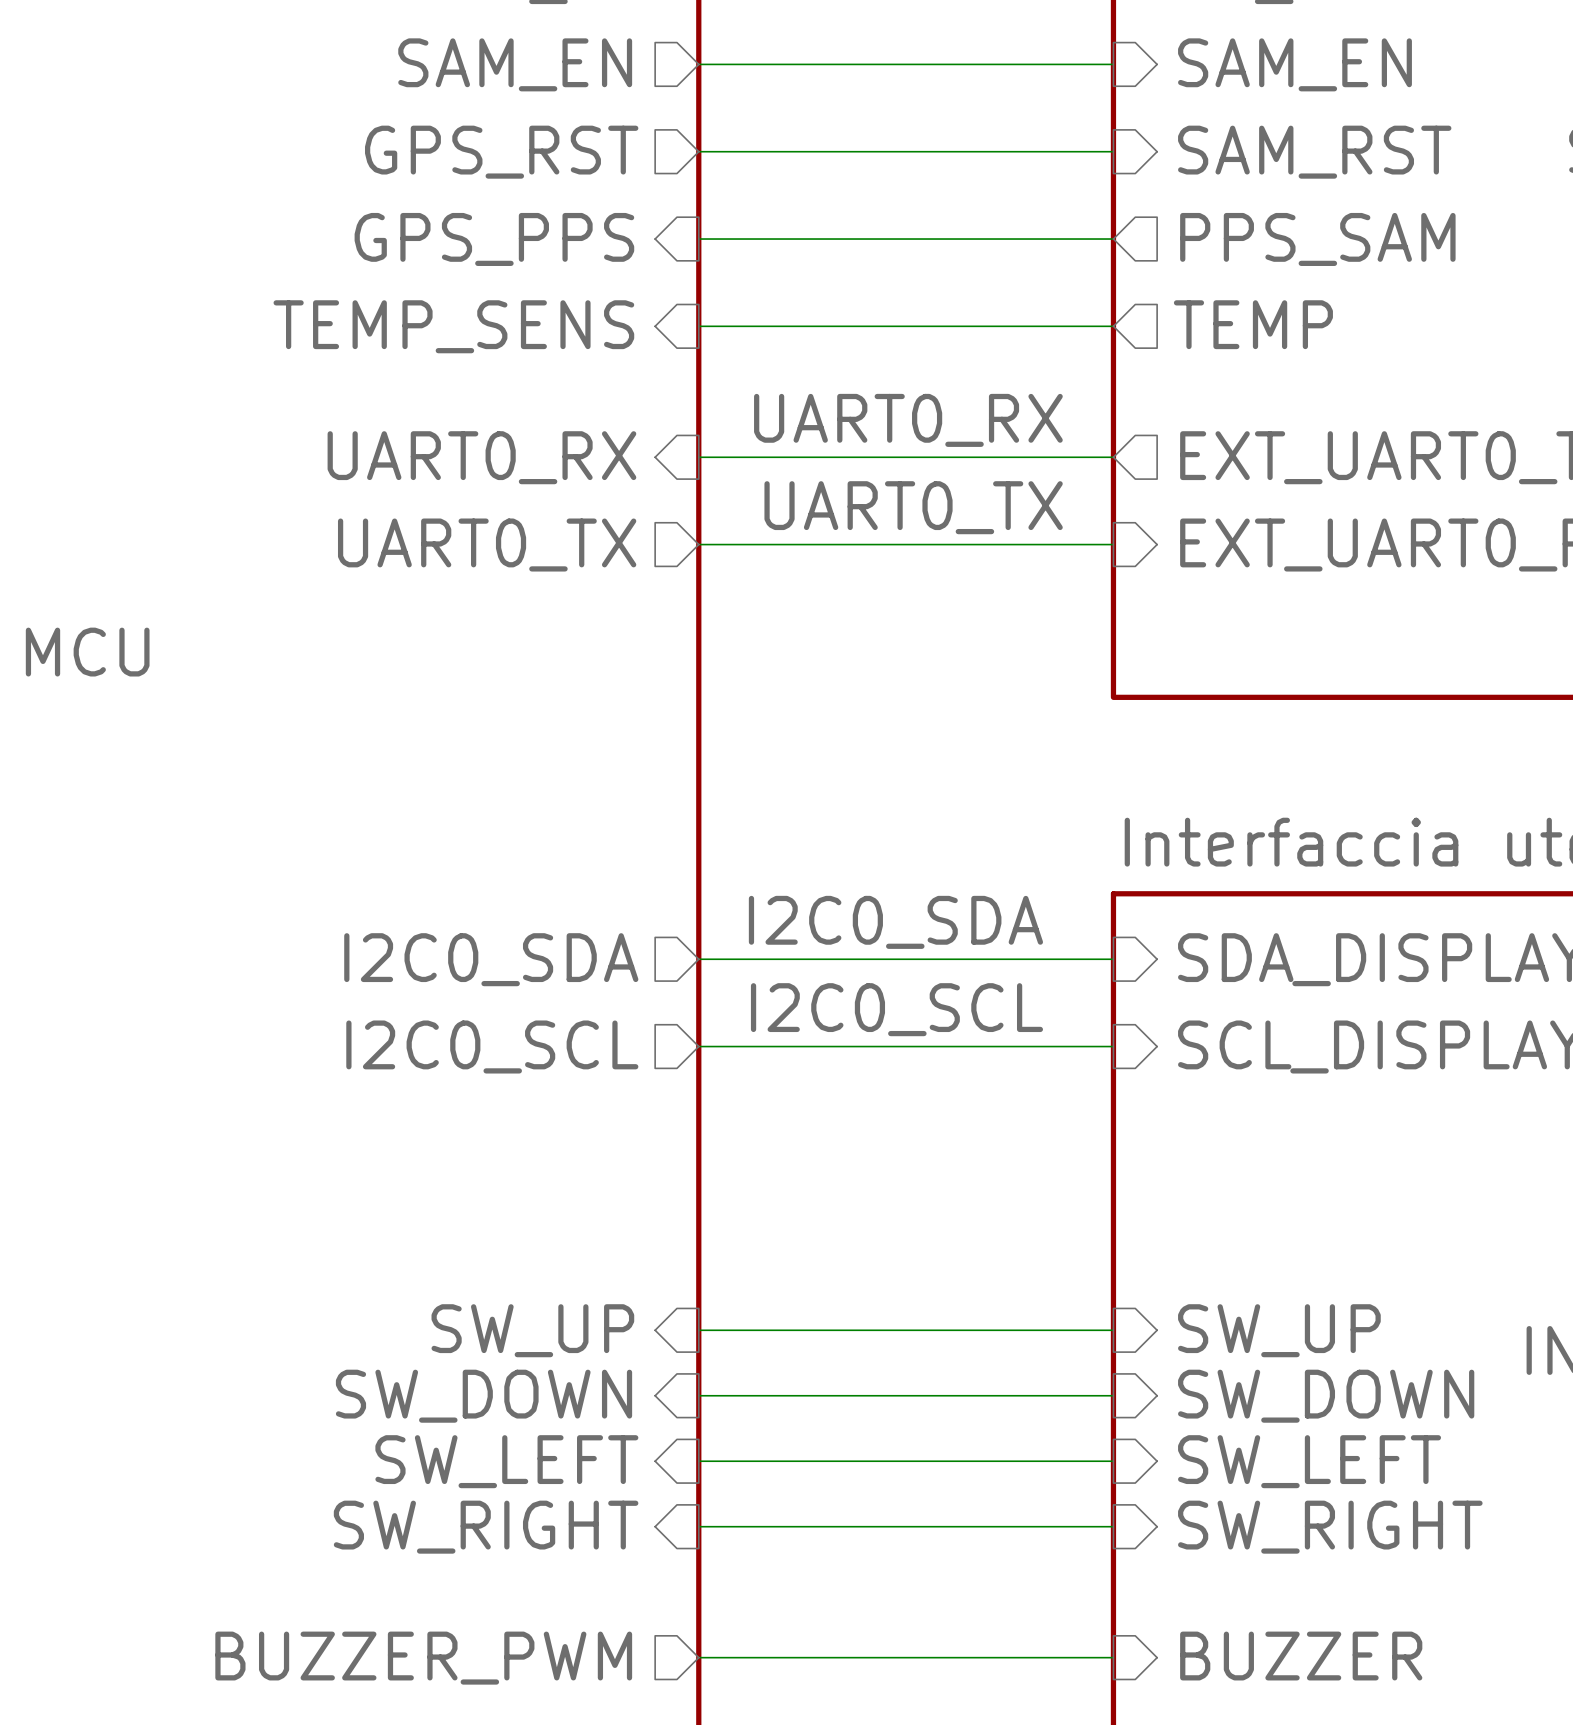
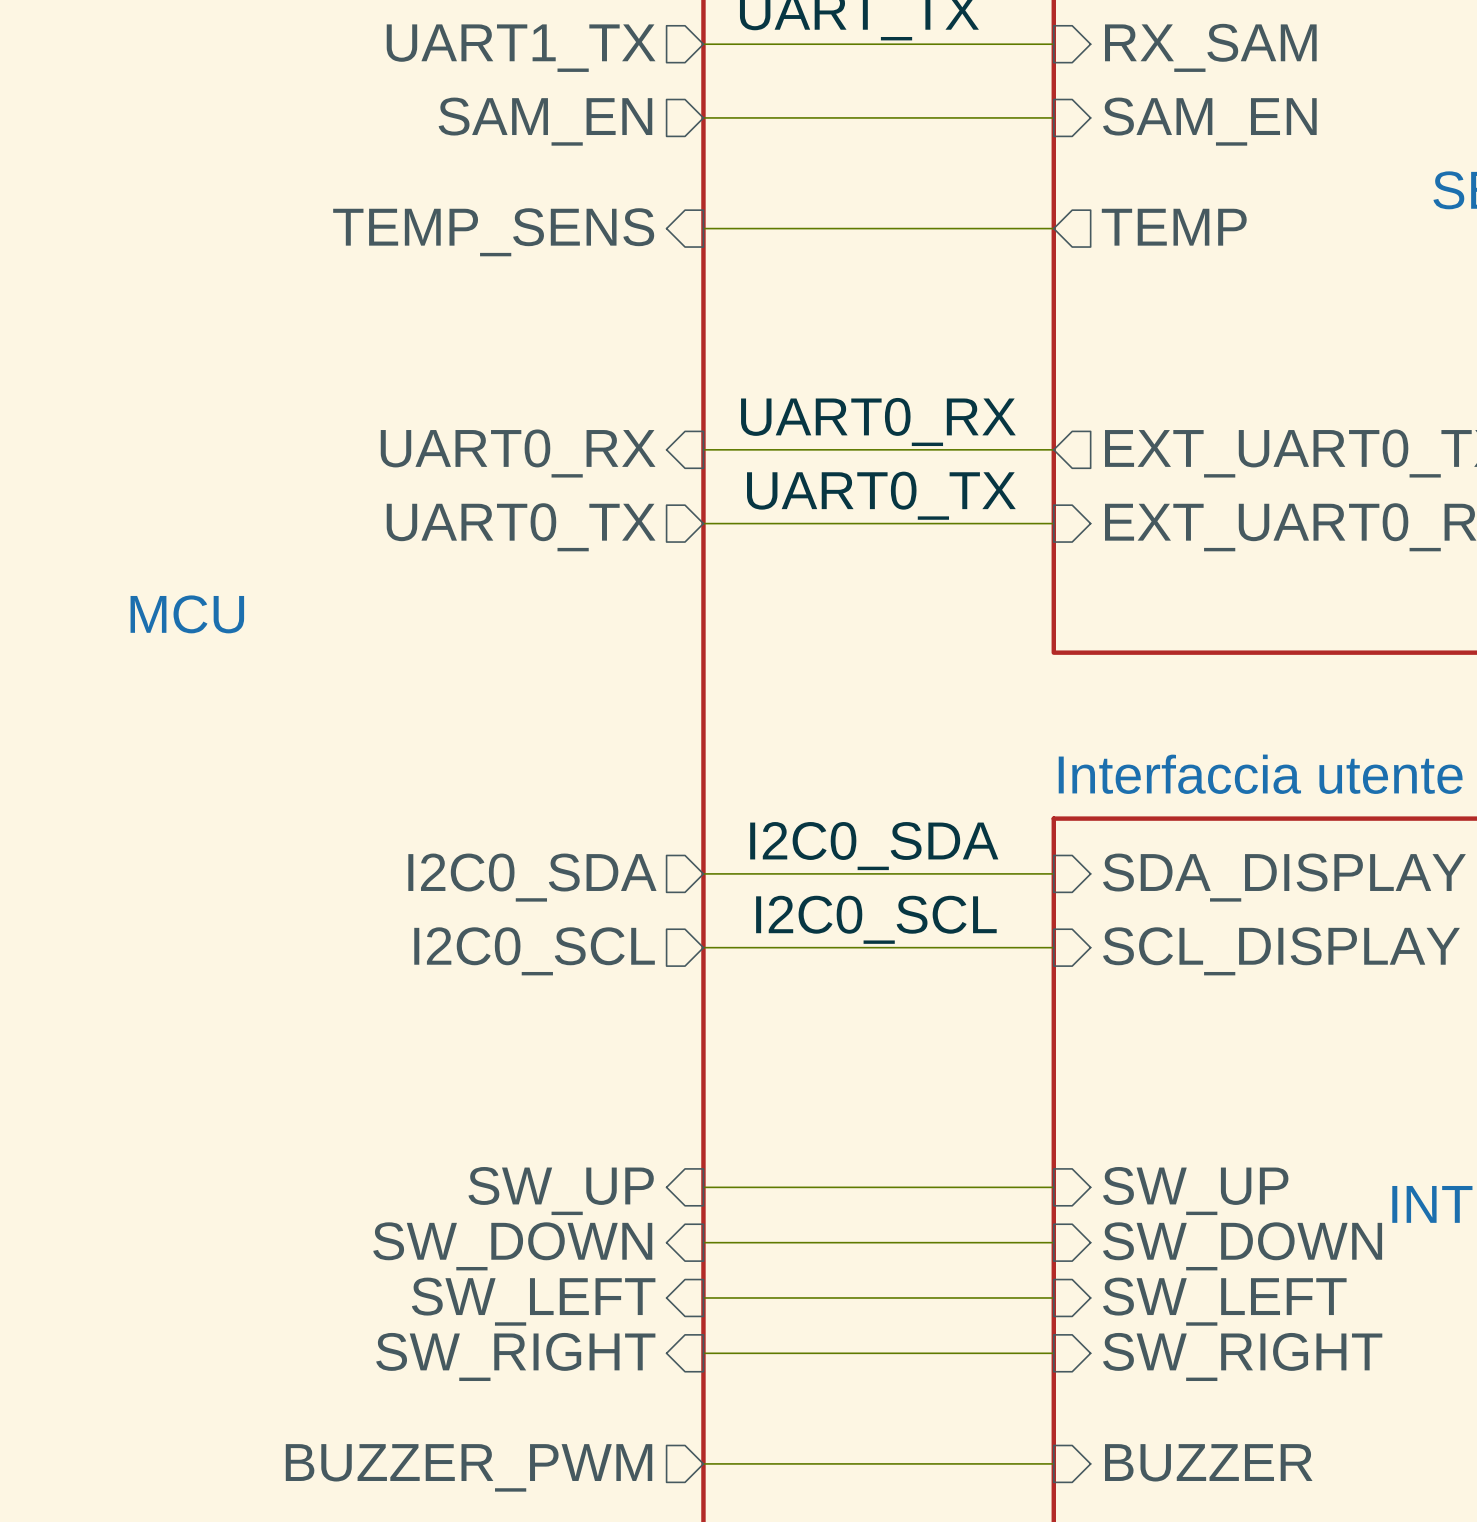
wire: (698, 151) (1113, 151) -> (703, 228) (1053, 228)
sheet pin: GPS_RST (501, 152) -> none
sheet pin: SAM_RST (1314, 152) -> none
sheet pin: GPS_PPS (494, 239) -> none
wire: (698, 239) (1113, 239) -> none
sheet pin: PPS_SAM (1317, 239) -> none
sheet pin position: TEMP (1253, 324) -> TEMP (1174, 227)
sheet pin position: TEMP_SENS (453, 326) -> TEMP_SENS (493, 232)
wire: (698, 326) (1113, 326) -> none

